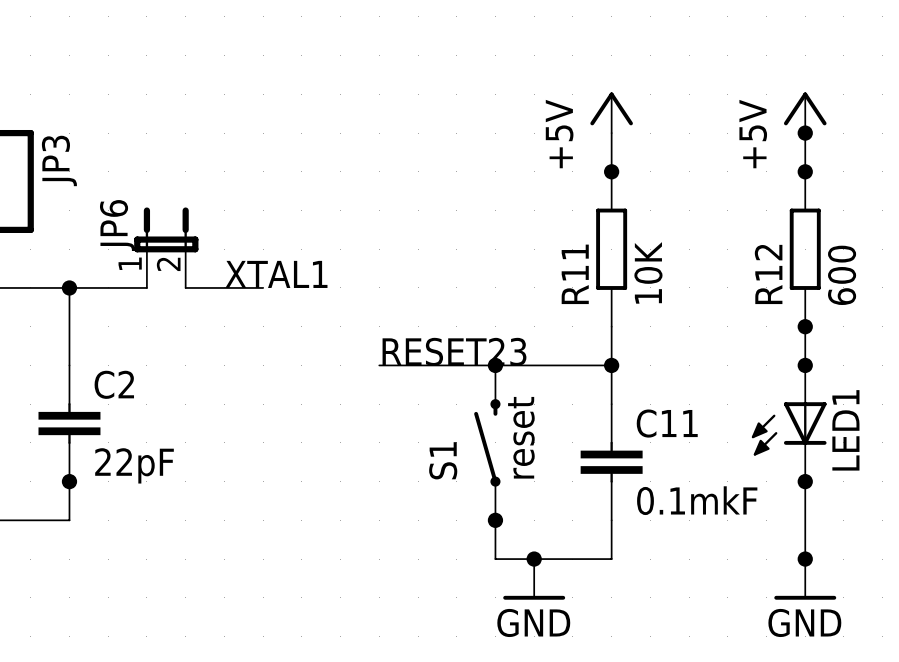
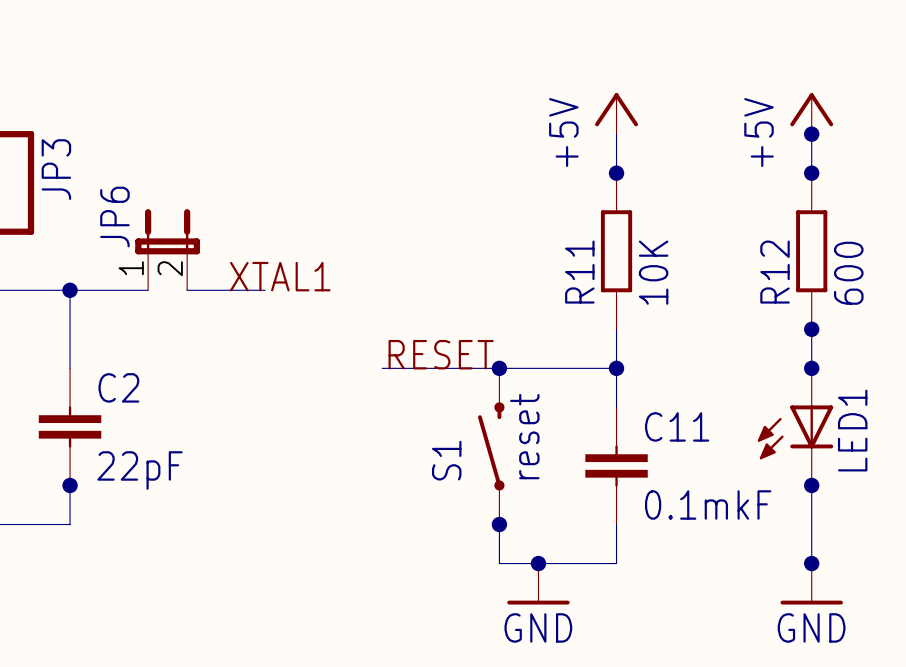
label: RESET23 (454, 351) -> RESET (441, 354)

